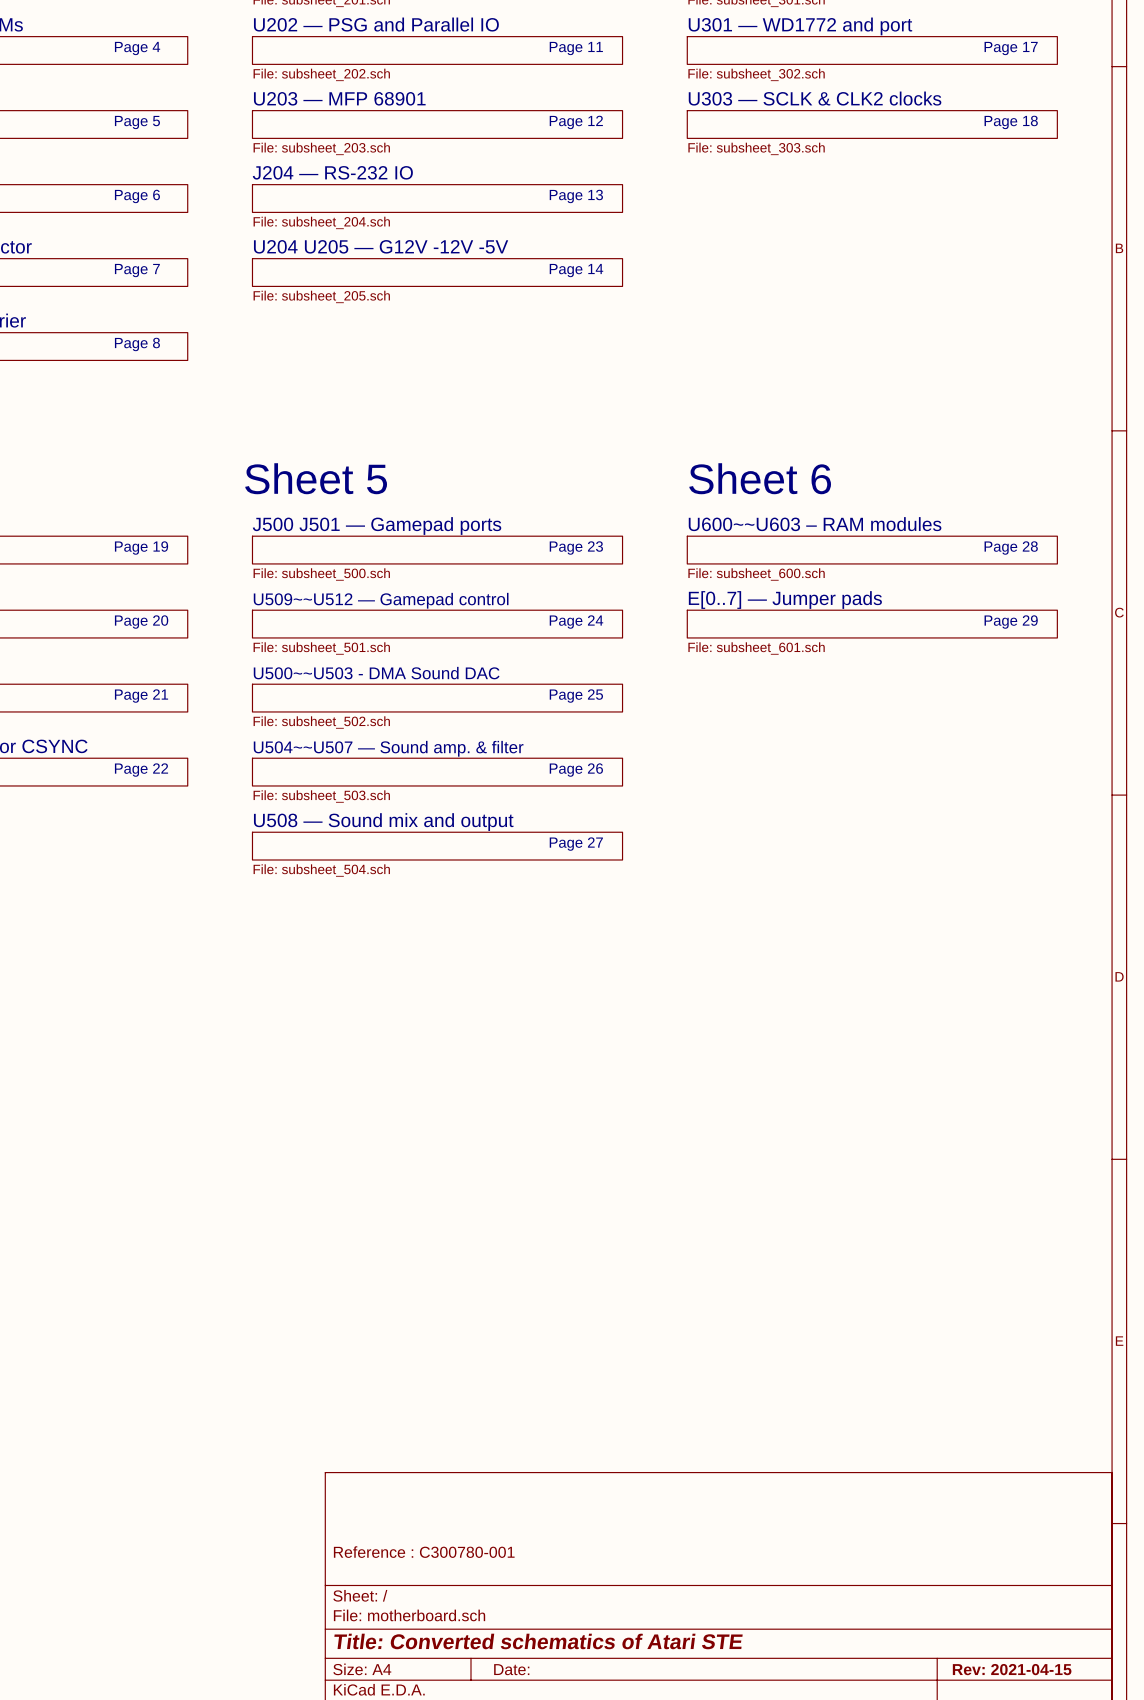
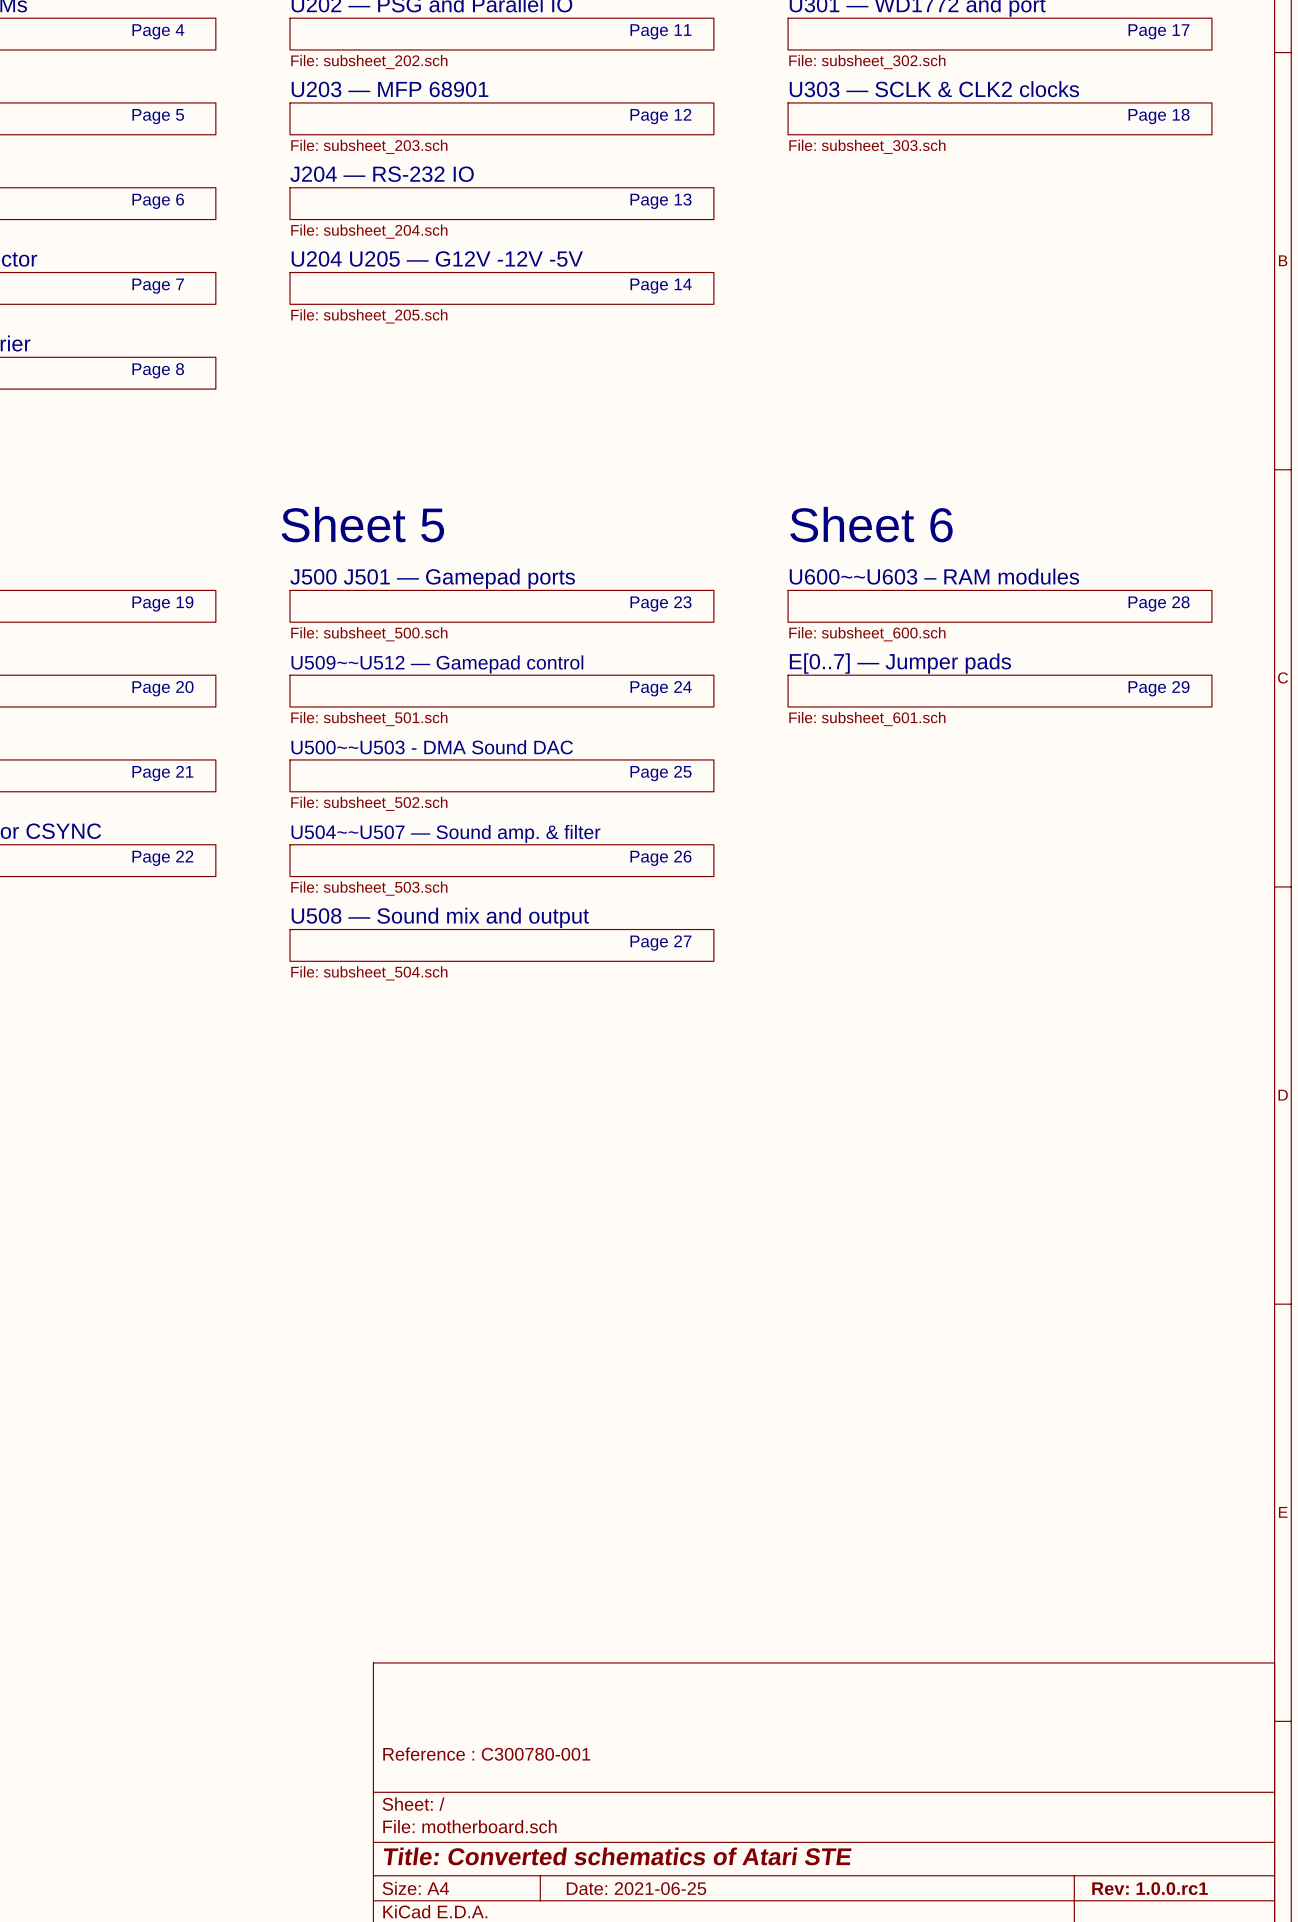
title block: Date: (511, 1669) -> Date: 2021-06-25 (636, 1888)
title block: Rev: 2021-04-15 (1012, 1669) -> Rev: 1.0.0.rc1 (1150, 1888)

